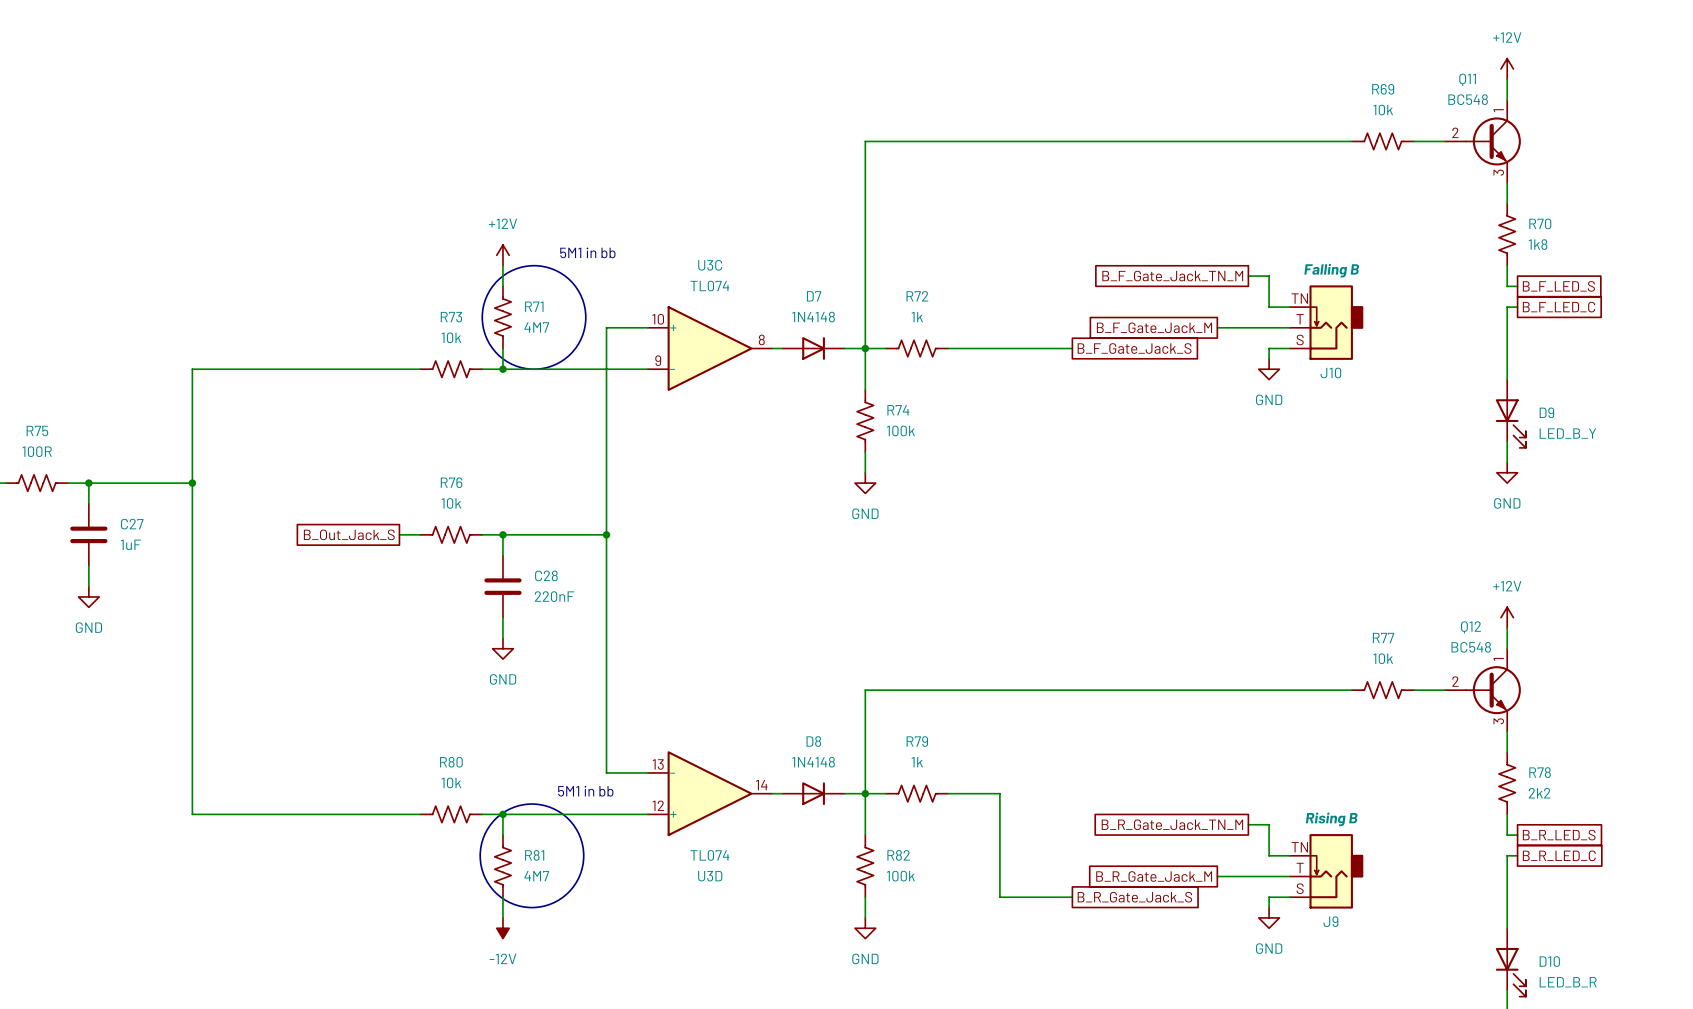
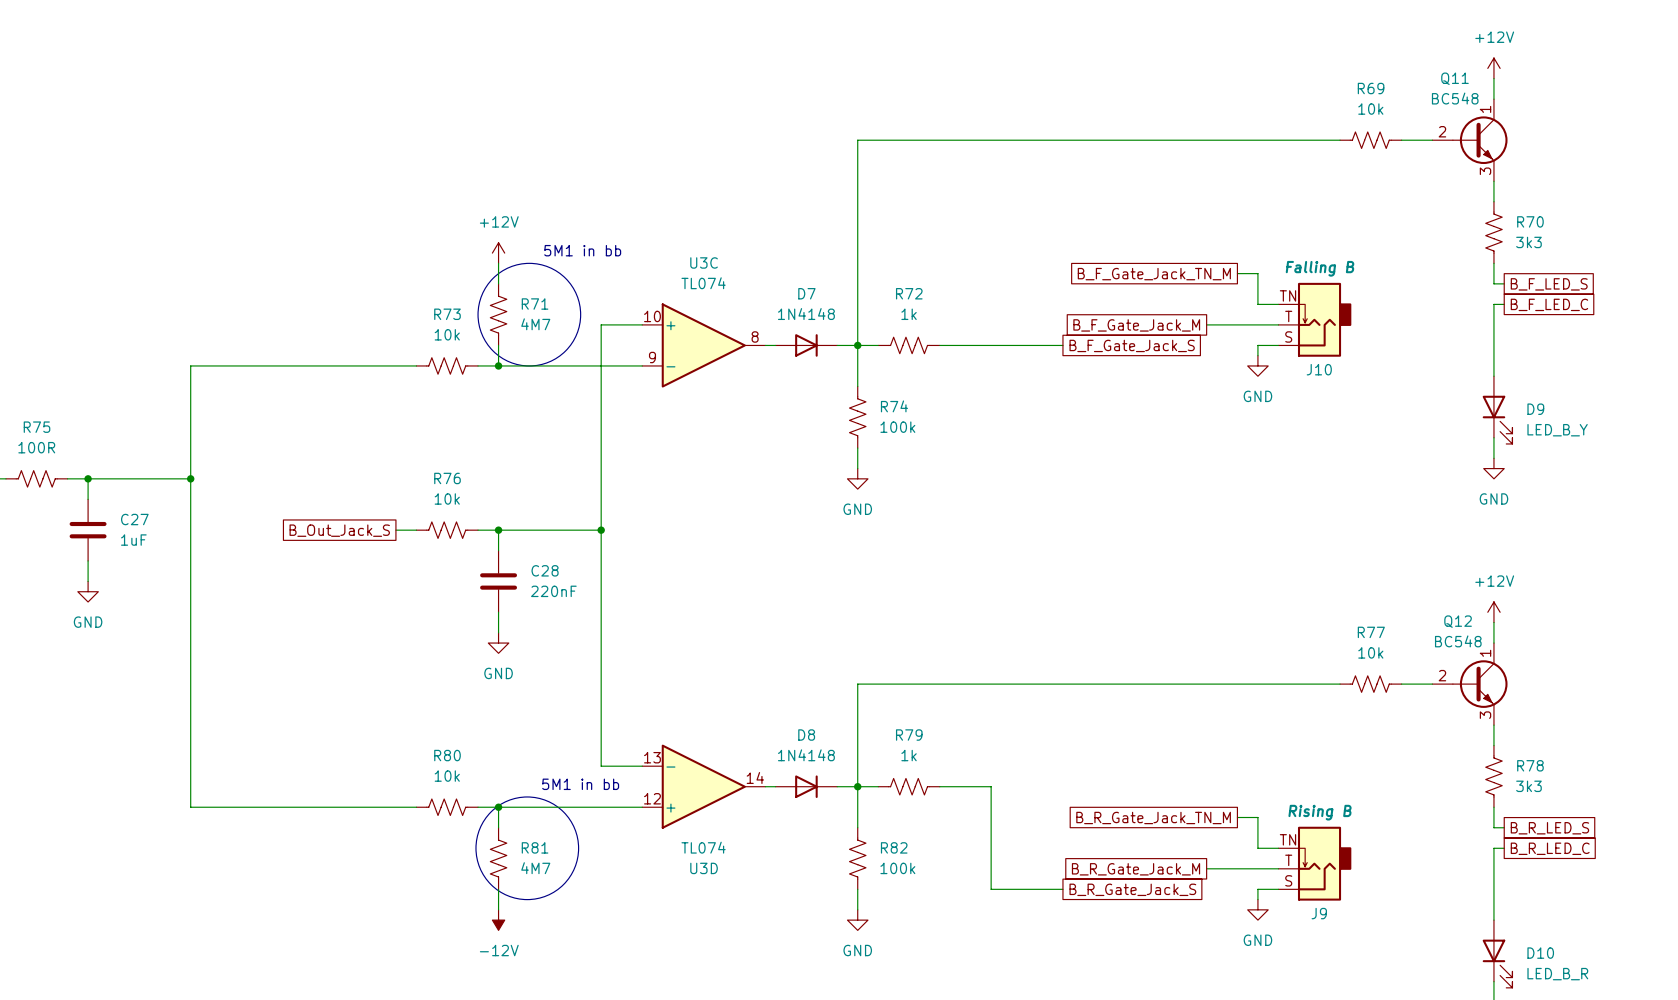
R70 value: 1k8 (1538, 244) -> 3k3 (1528, 242)
R78 value: 2k2 (1539, 793) -> 3k3 (1528, 786)

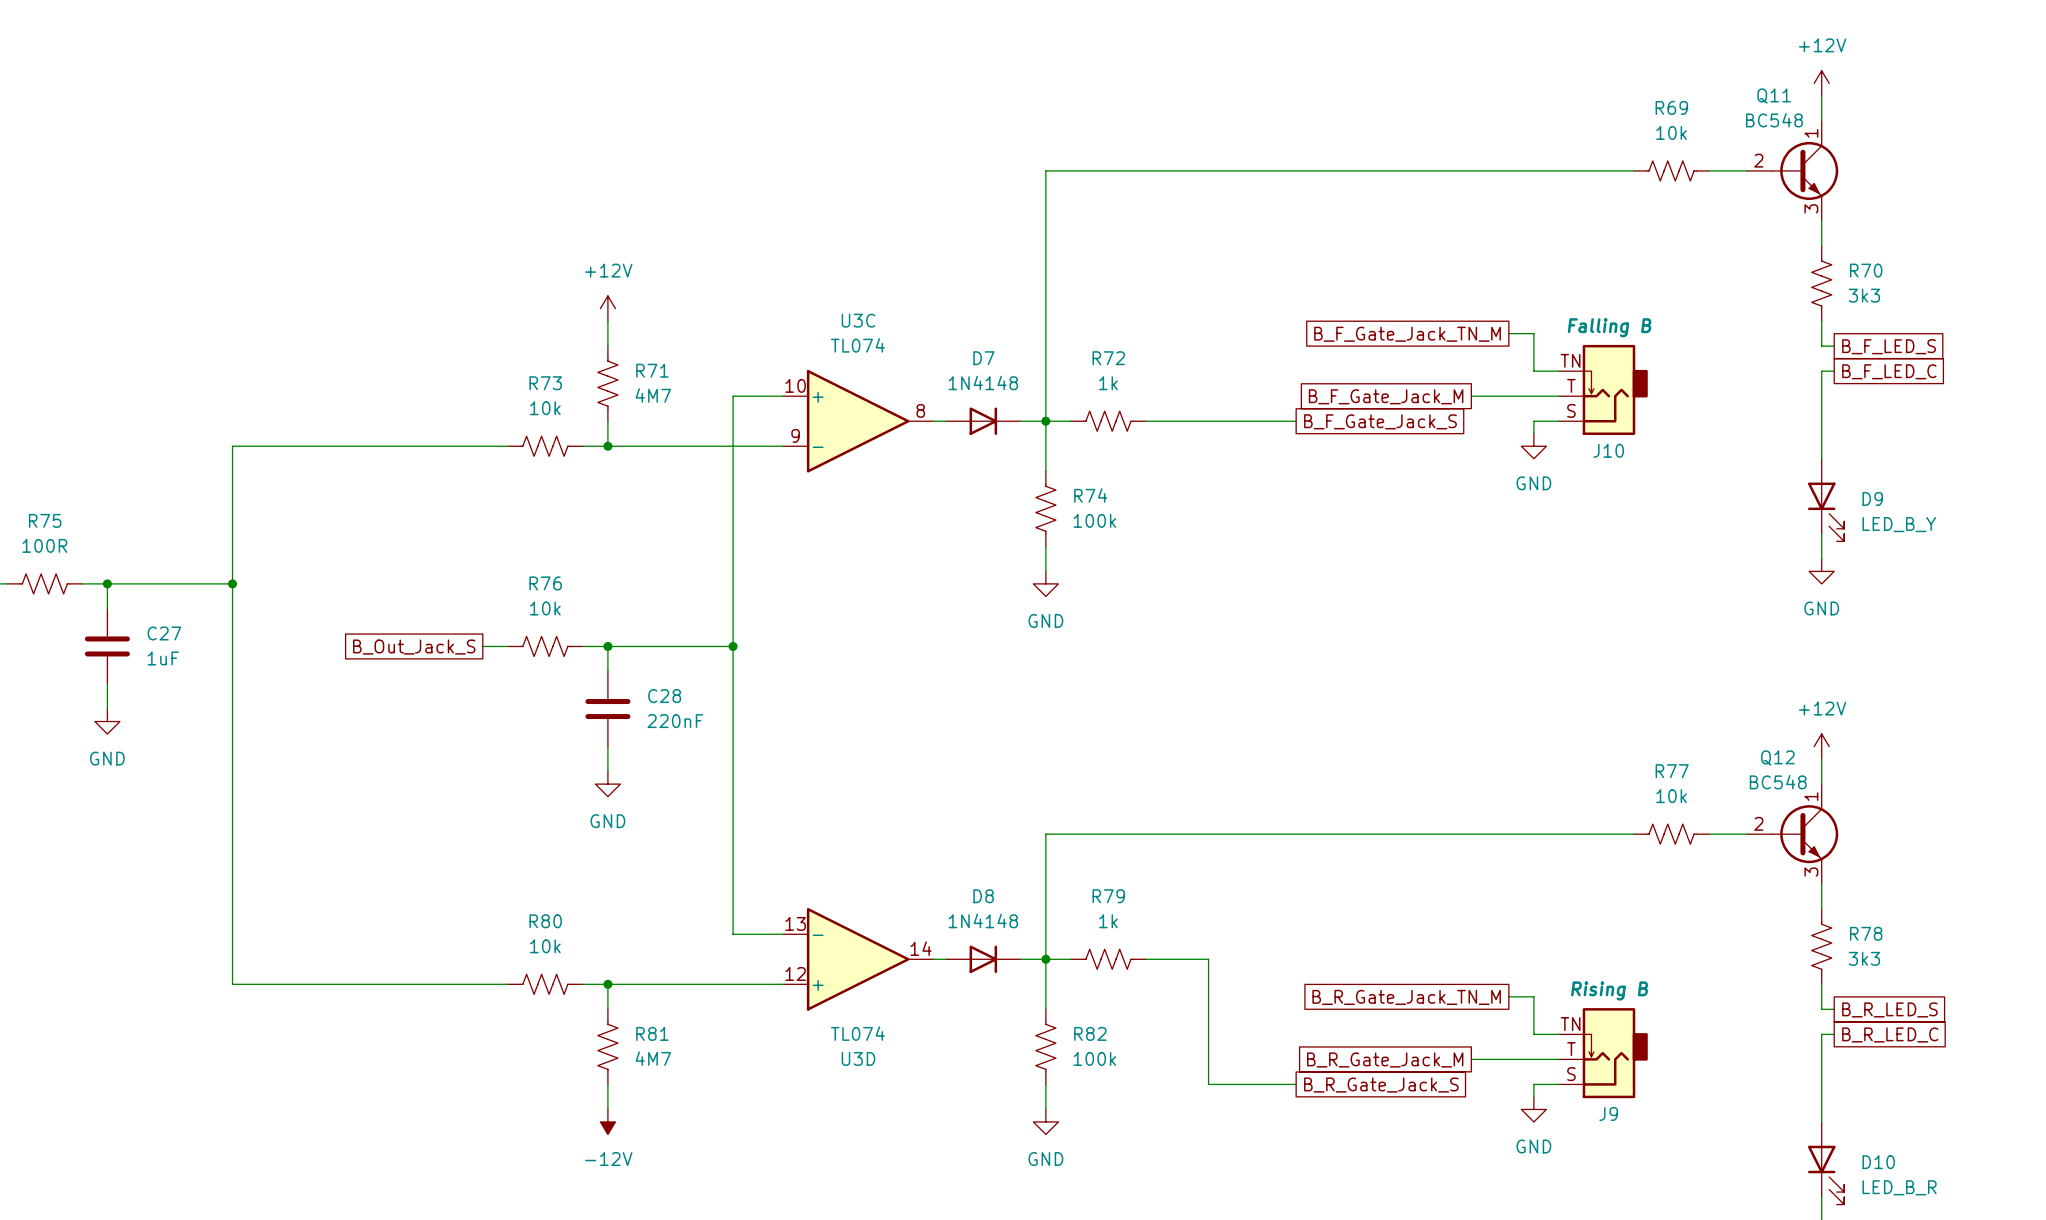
text: 5M1 in bb (582, 250) -> none
drawing: [478, 263, 581, 366] -> none
text: 5M1 in bb (580, 784) -> none
drawing: [475, 796, 579, 900] -> none

